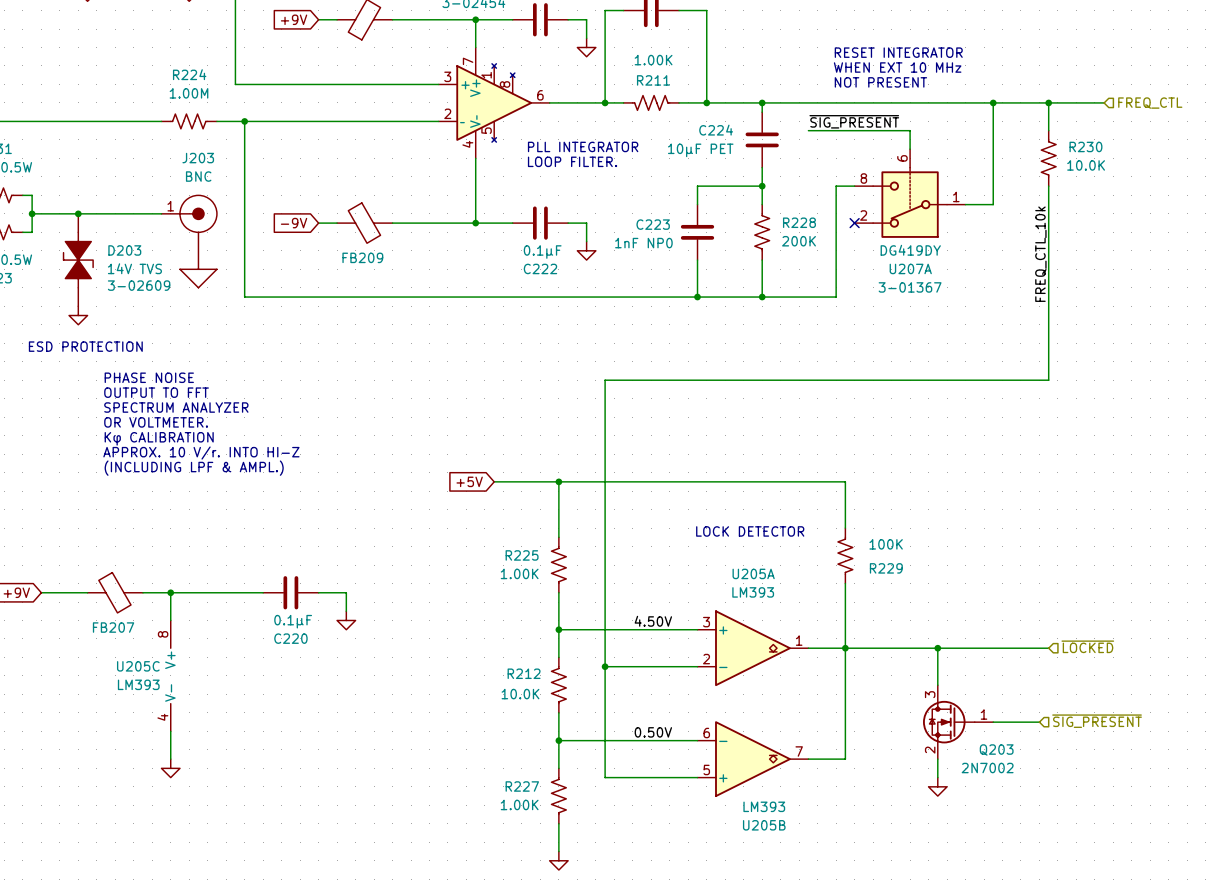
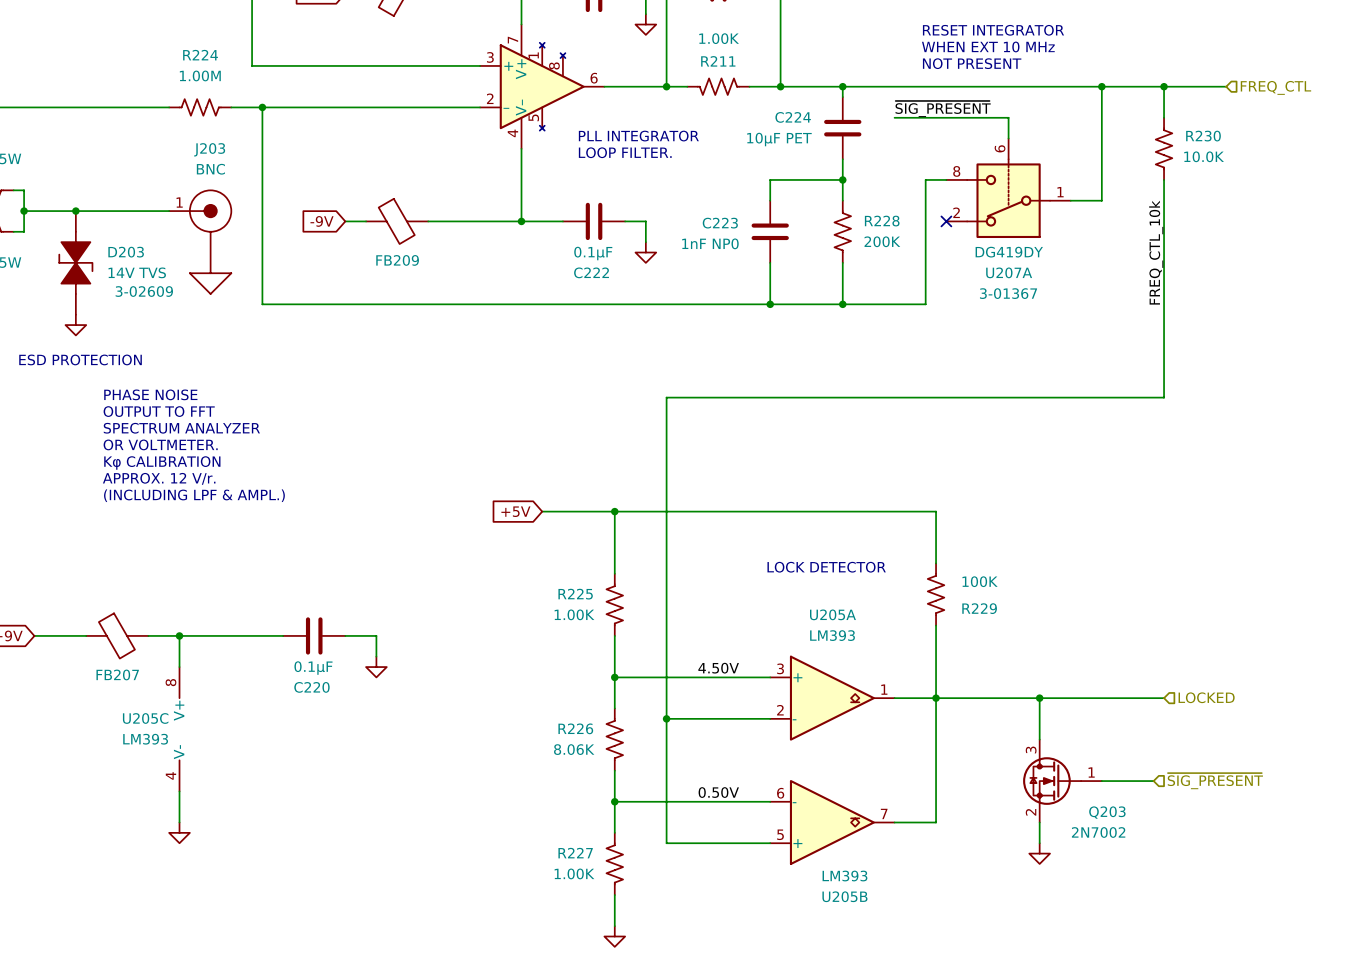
text: APPROX. 10 V/r. INTO HI-Z (201, 453) -> APPROX. 12 V/r. (159, 478)
hierarchical label: ~{LOCKED} (1087, 646) -> LOCKED (1206, 697)
R212 name: R212 (524, 673) -> R226 (575, 728)
R212 value: 10.0K (520, 694) -> 8.06K (574, 749)

